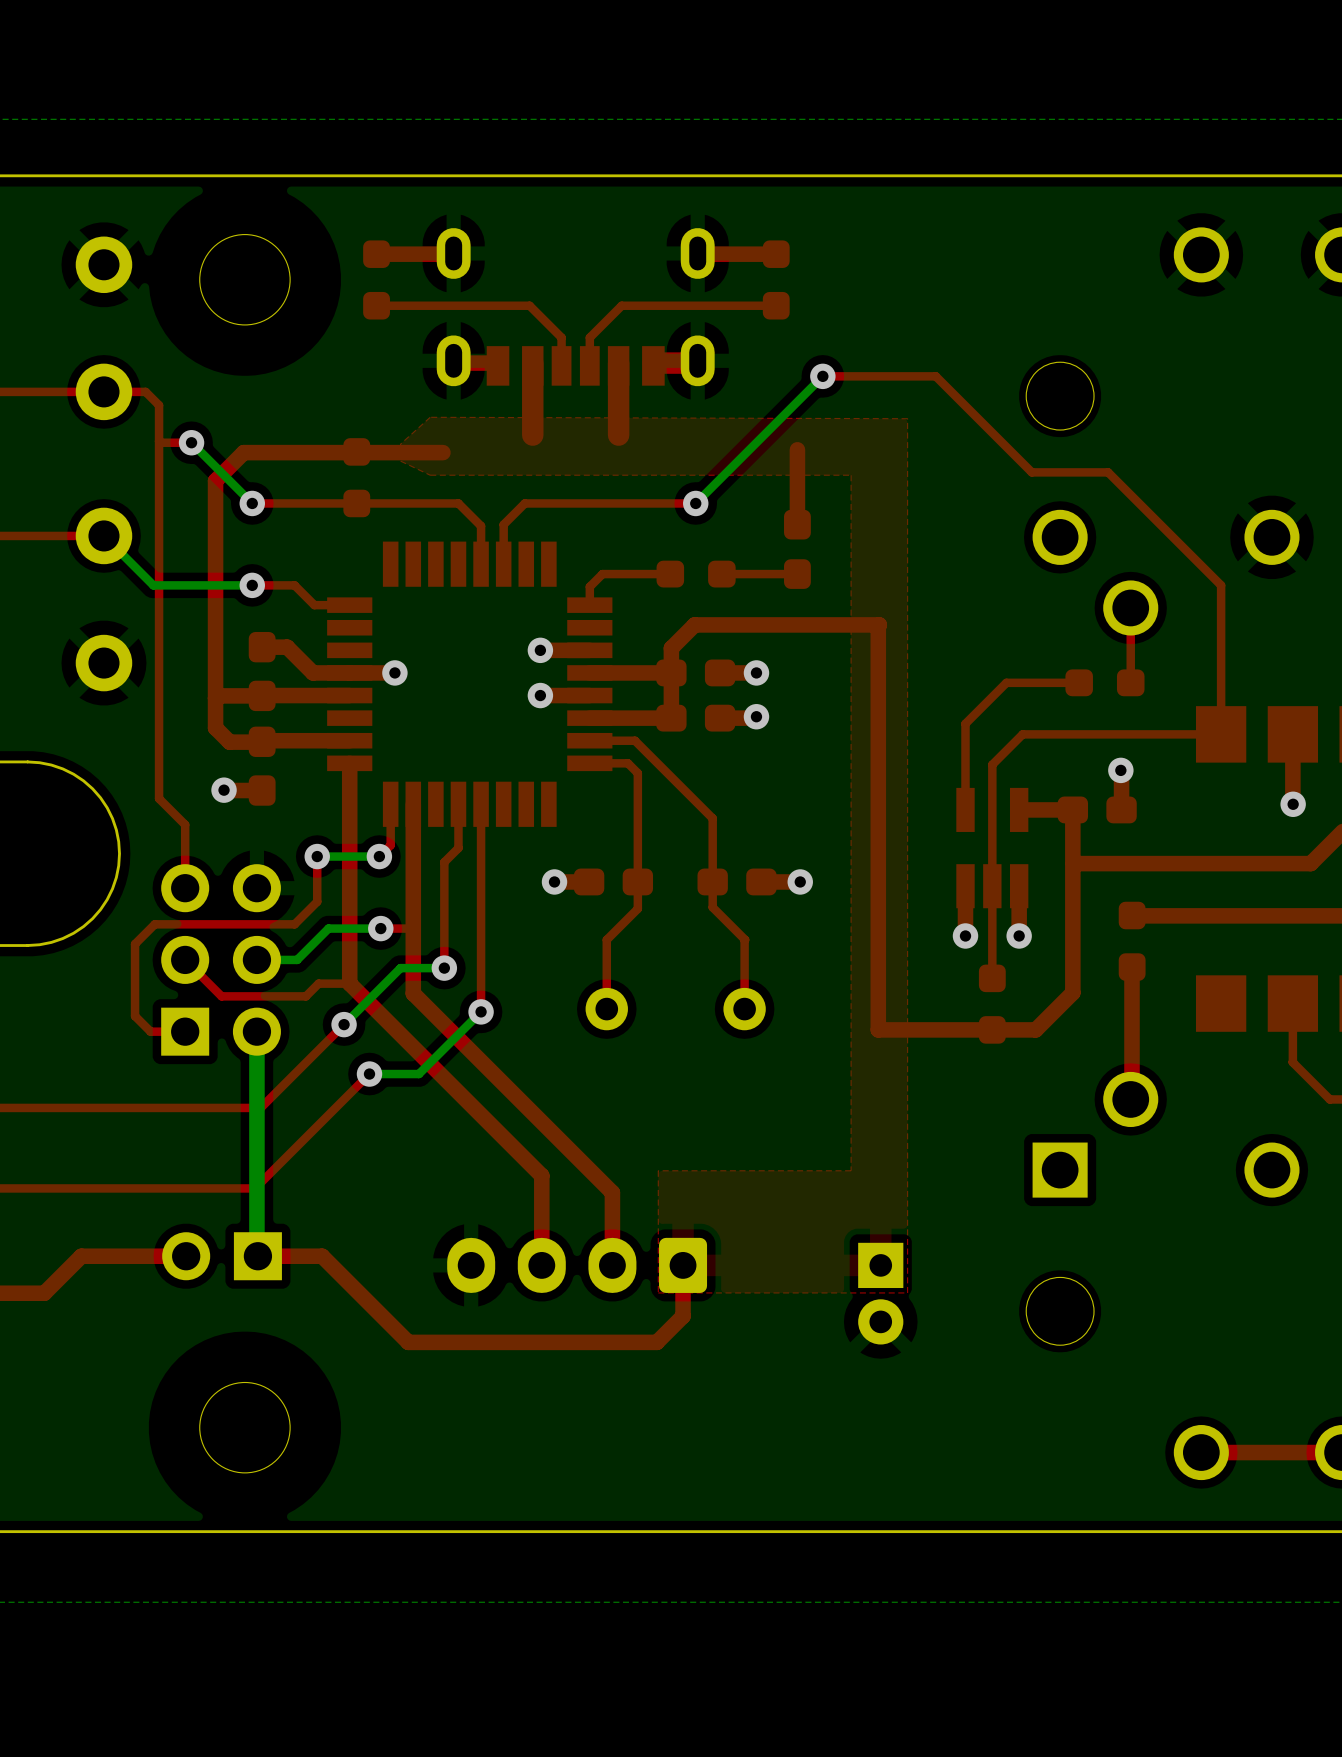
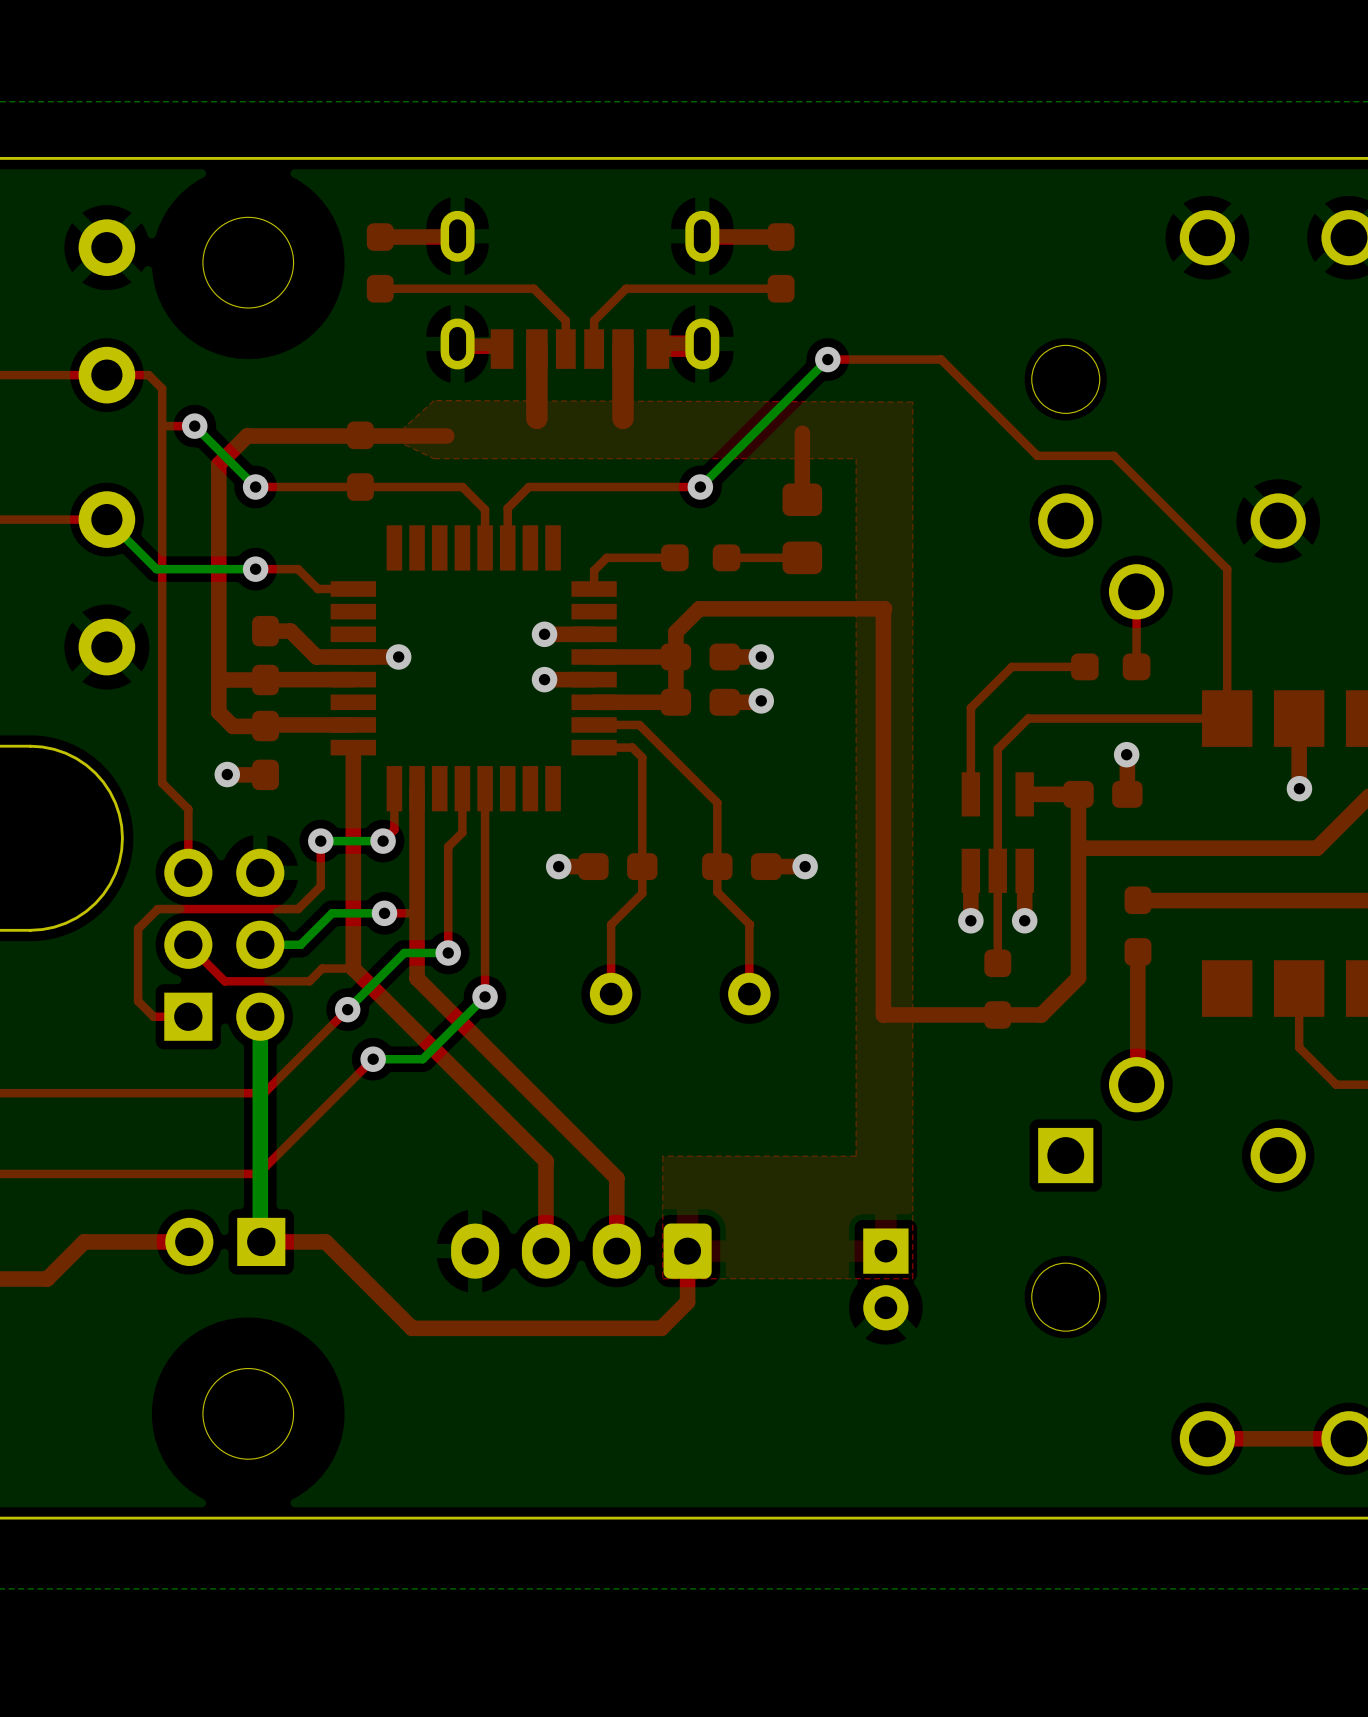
part footprint: [784, 509, 811, 589] -> [782, 483, 823, 575]

